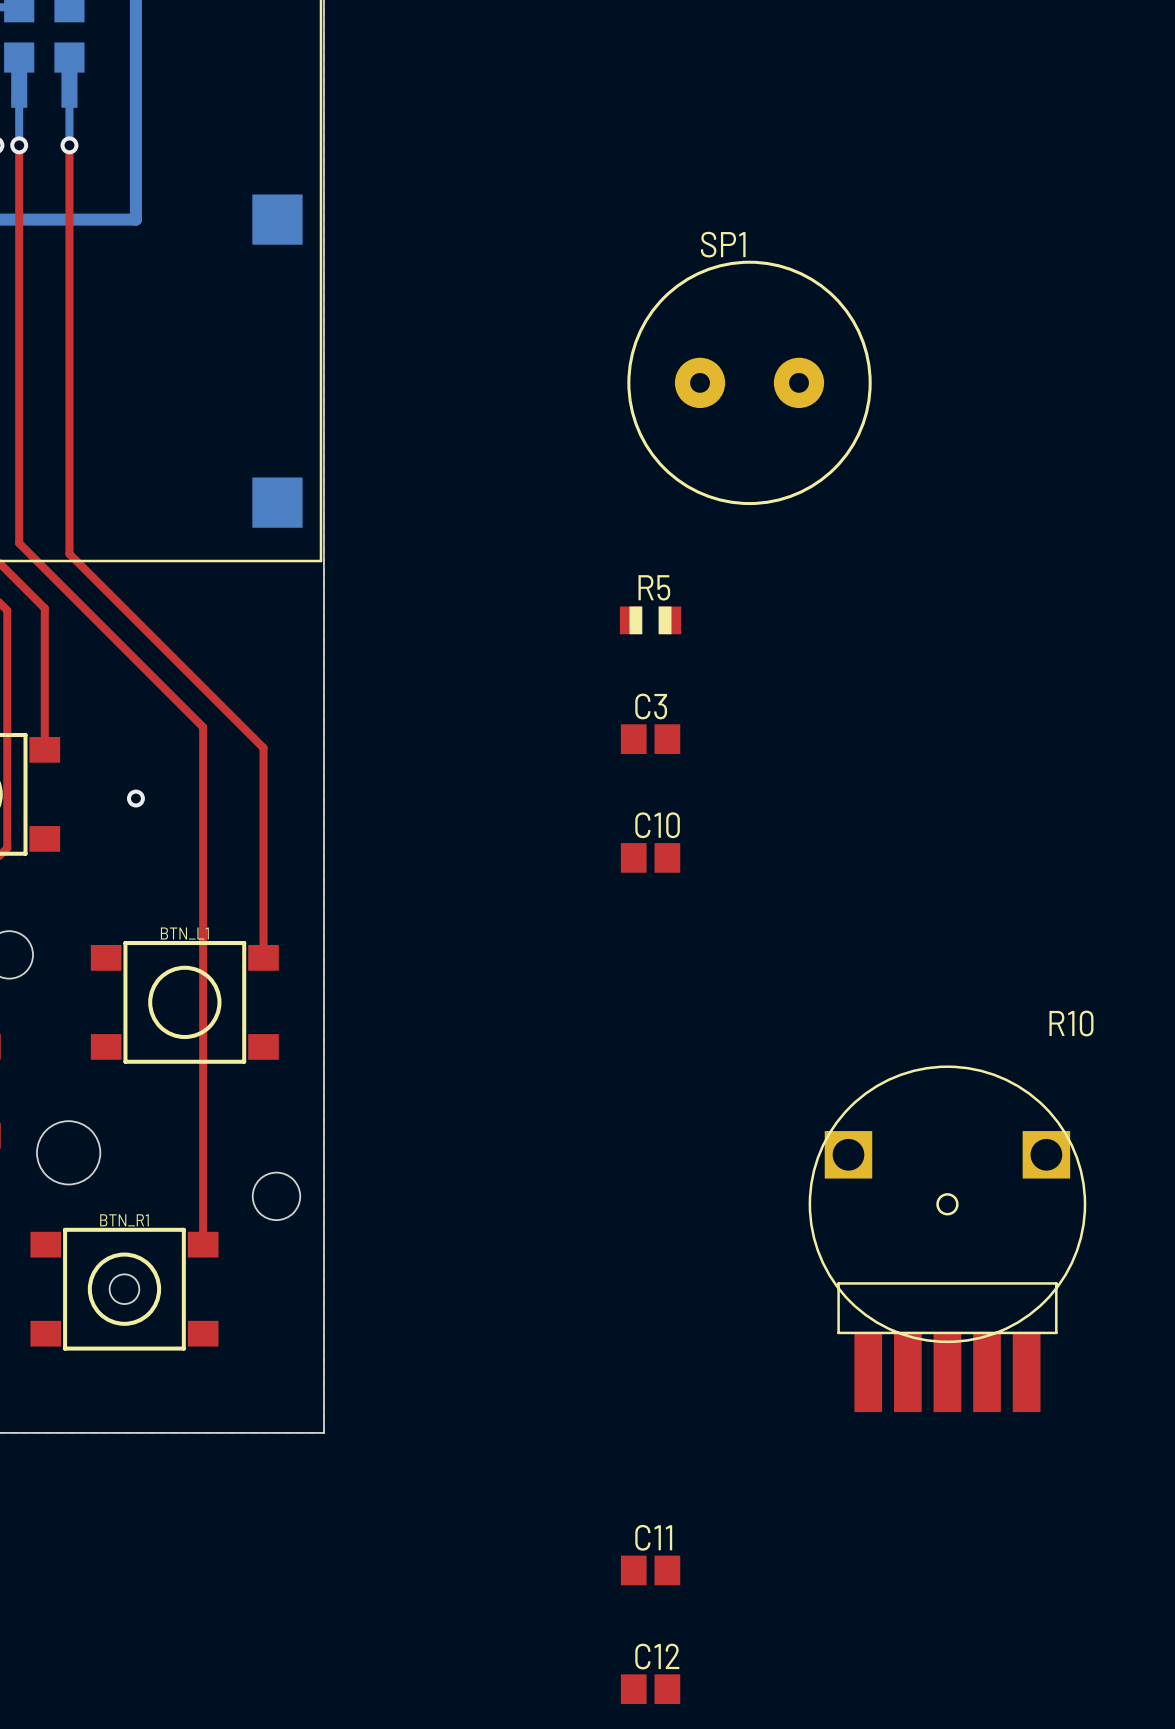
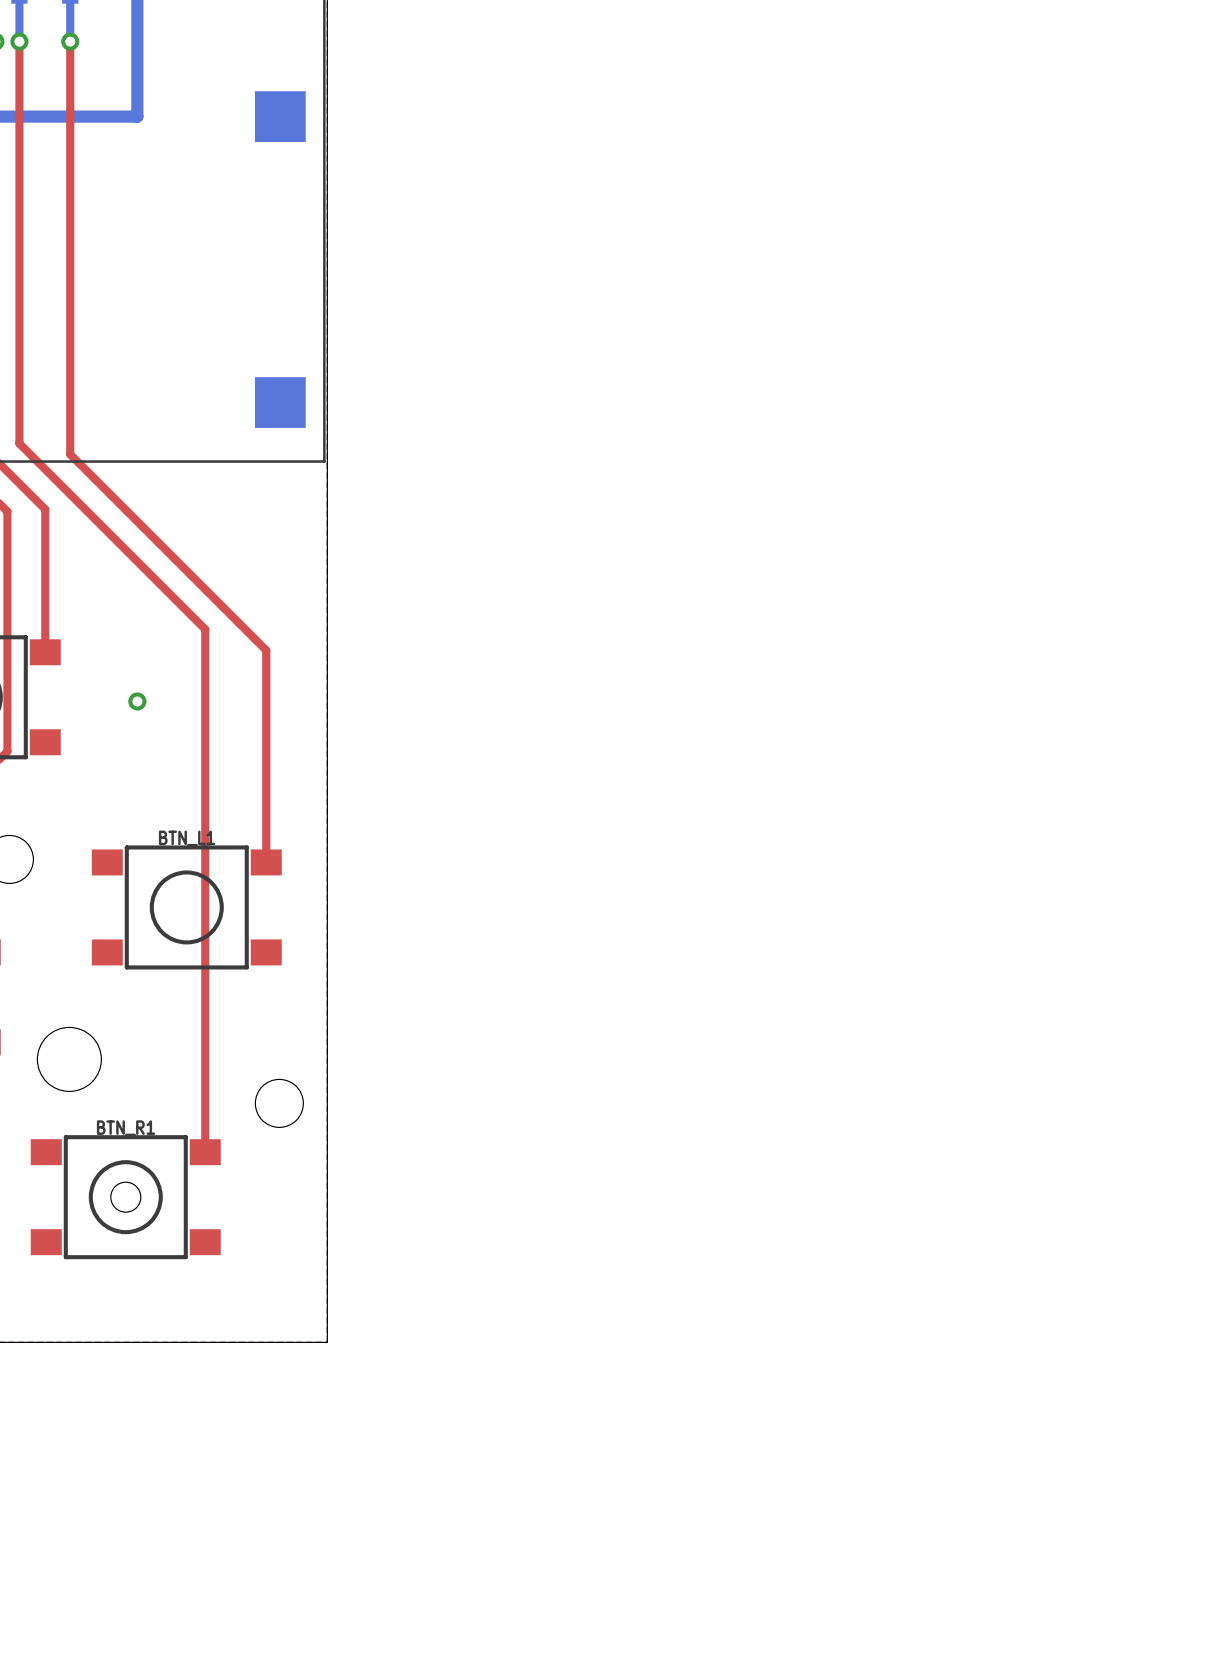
SP1: (749, 382) -> none
R5: (650, 620) -> none
C3: (650, 739) -> none
C10: (650, 857) -> none
R10: (947, 1238) -> none
C11: (650, 1570) -> none
C12: (650, 1689) -> none

